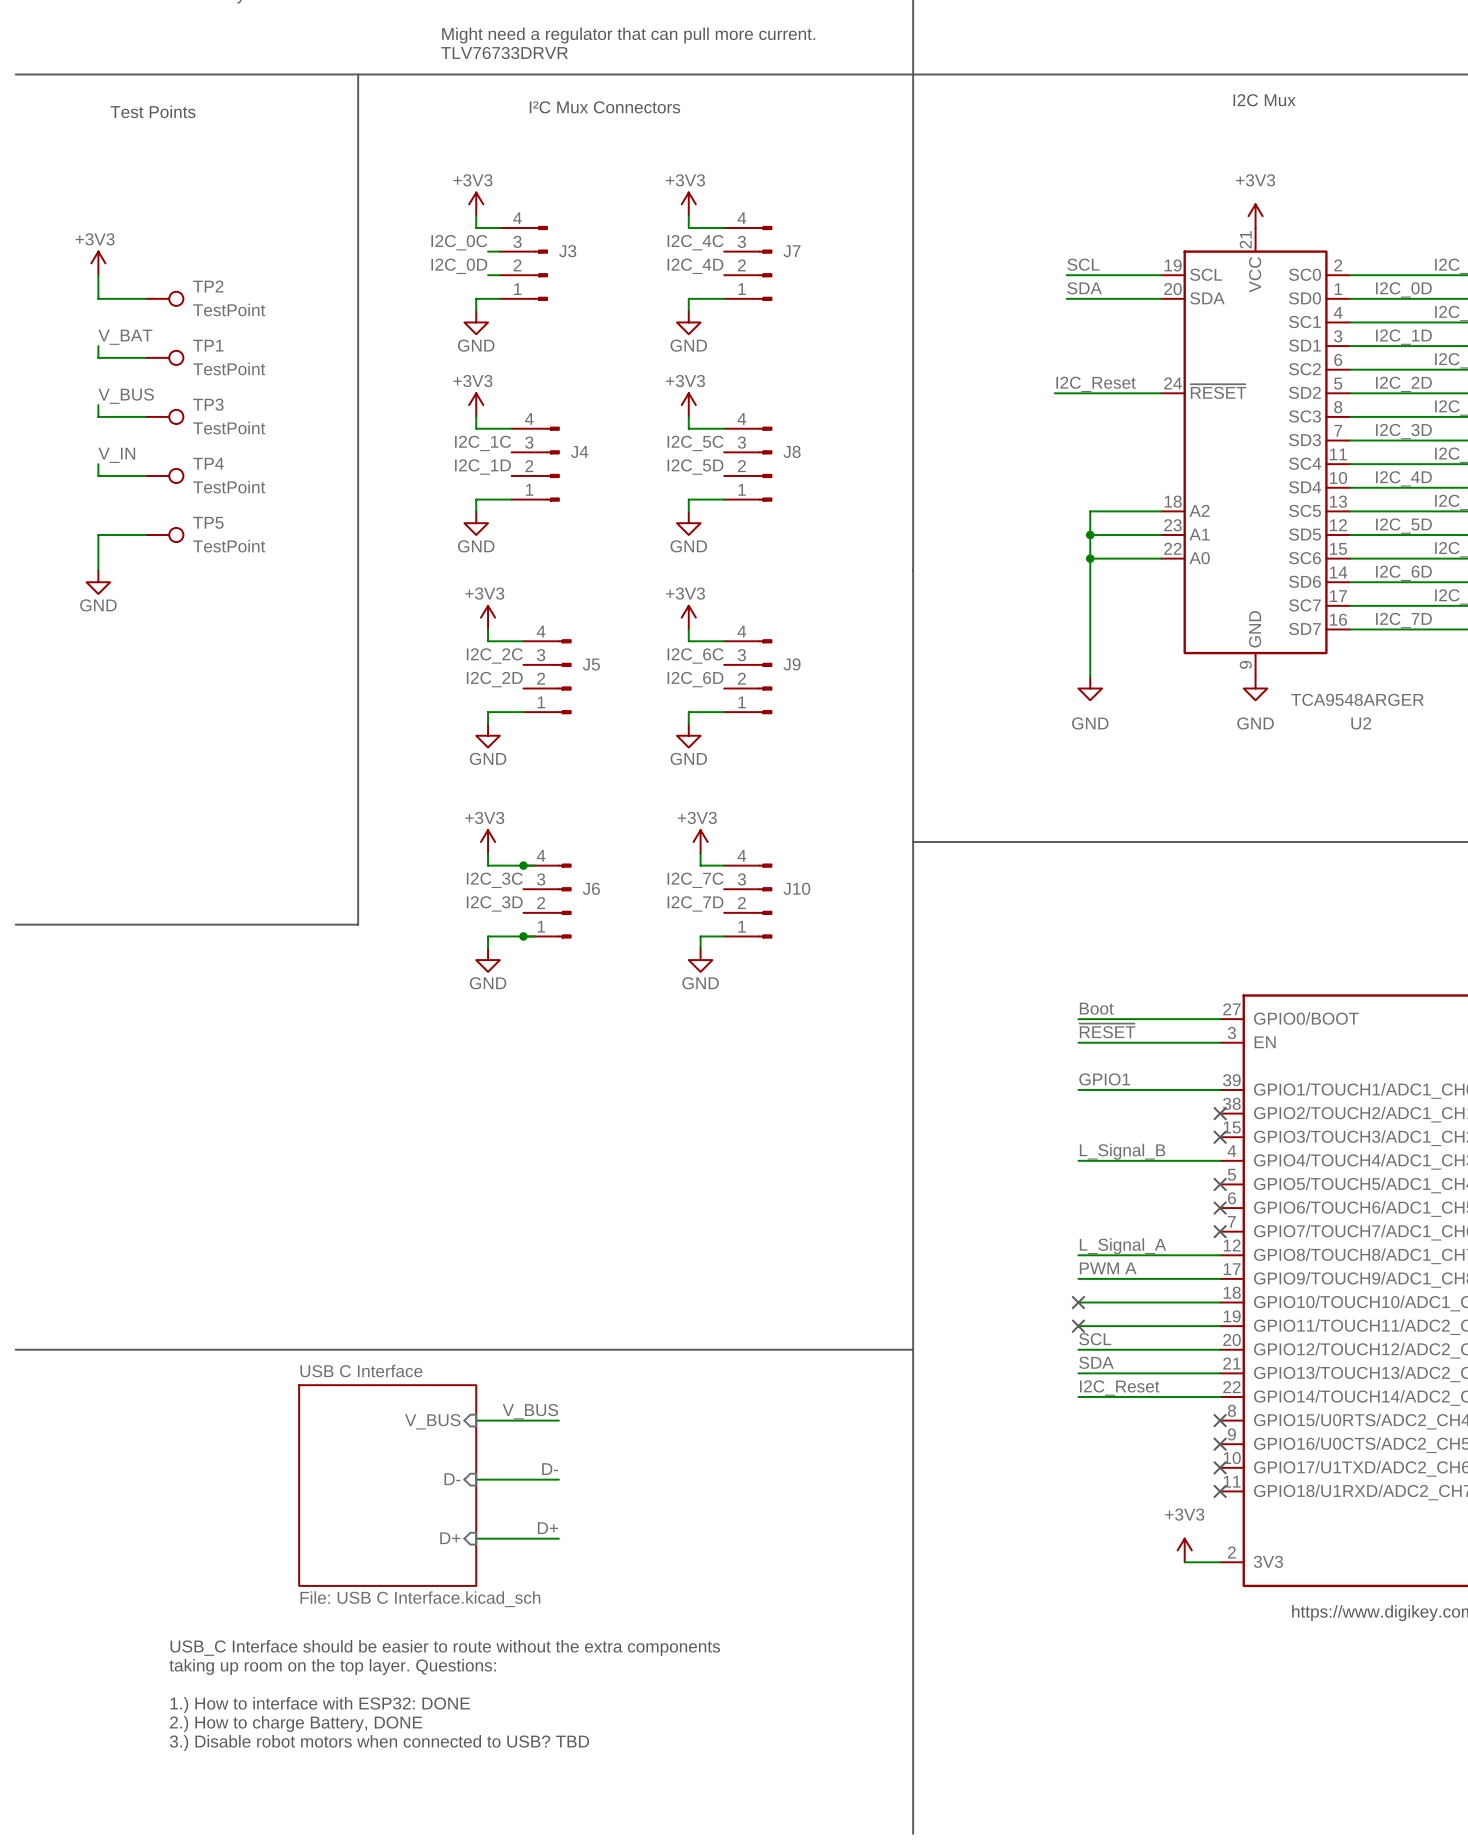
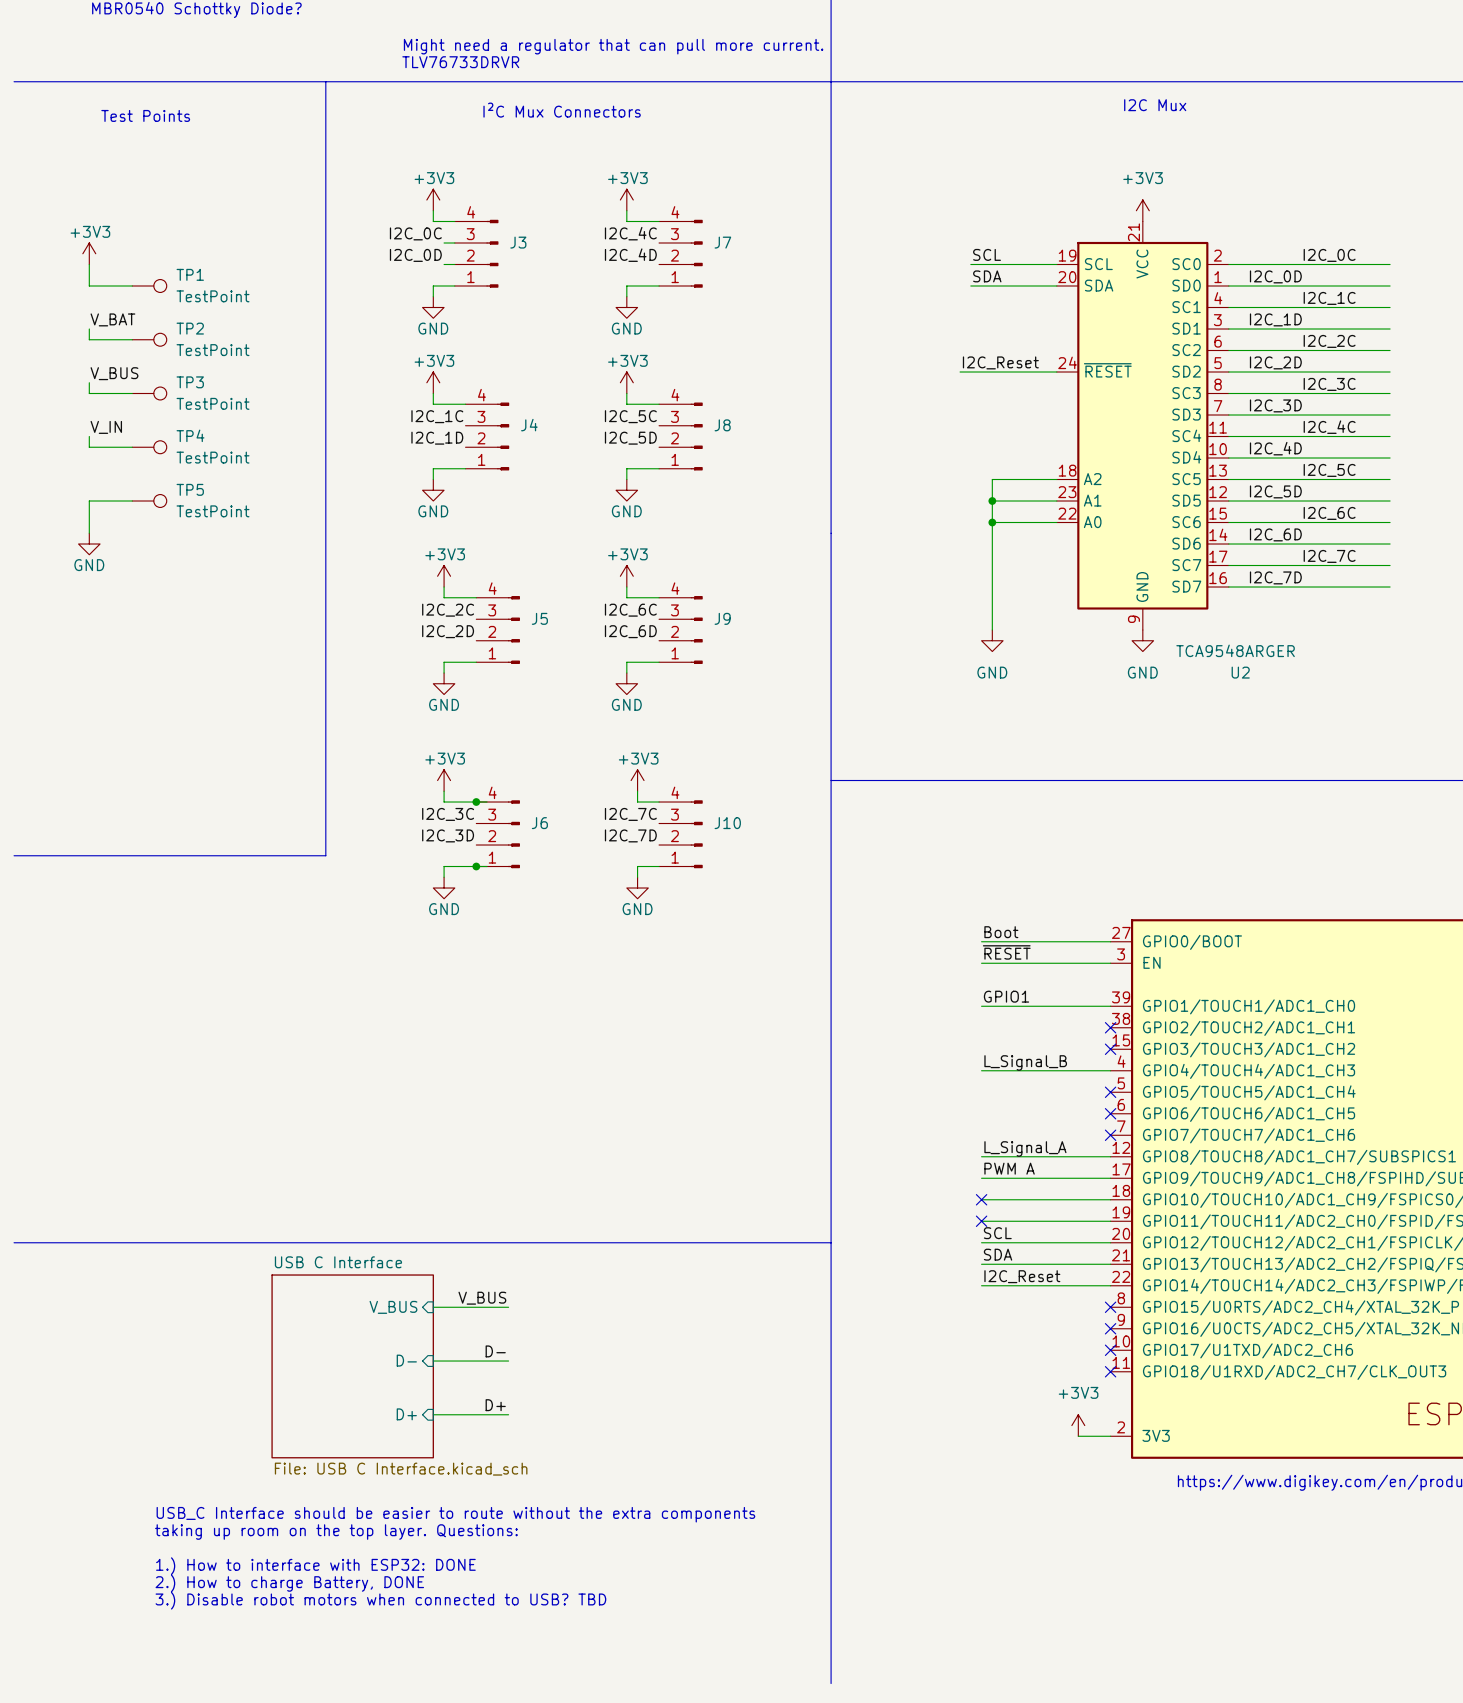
TP2 name: TP2 (208, 286) -> TP1 (190, 274)
TP1 name: TP1 (208, 345) -> TP2 (190, 328)

